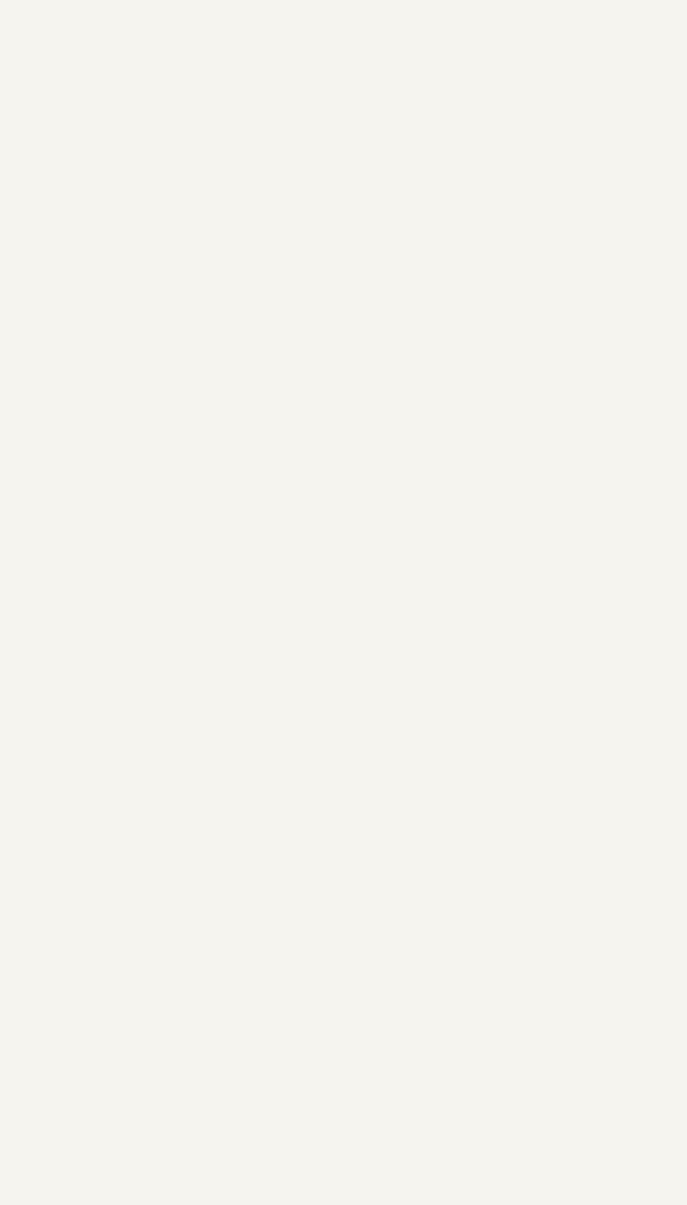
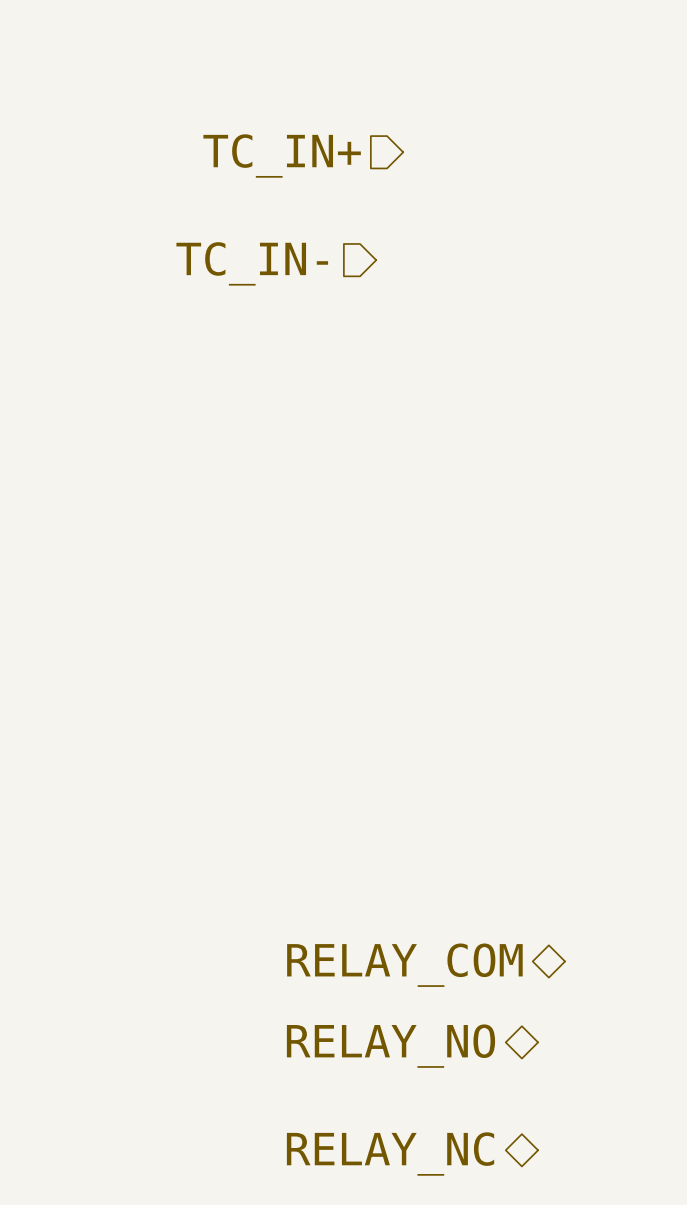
hierarchical label: none -> TC_IN+ (282, 156)
hierarchical label: none -> TC_IN- (252, 263)
hierarchical label: none -> RELAY_COM (404, 965)
hierarchical label: none -> RELAY_NO (391, 1046)
hierarchical label: none -> RELAY_NC (390, 1154)

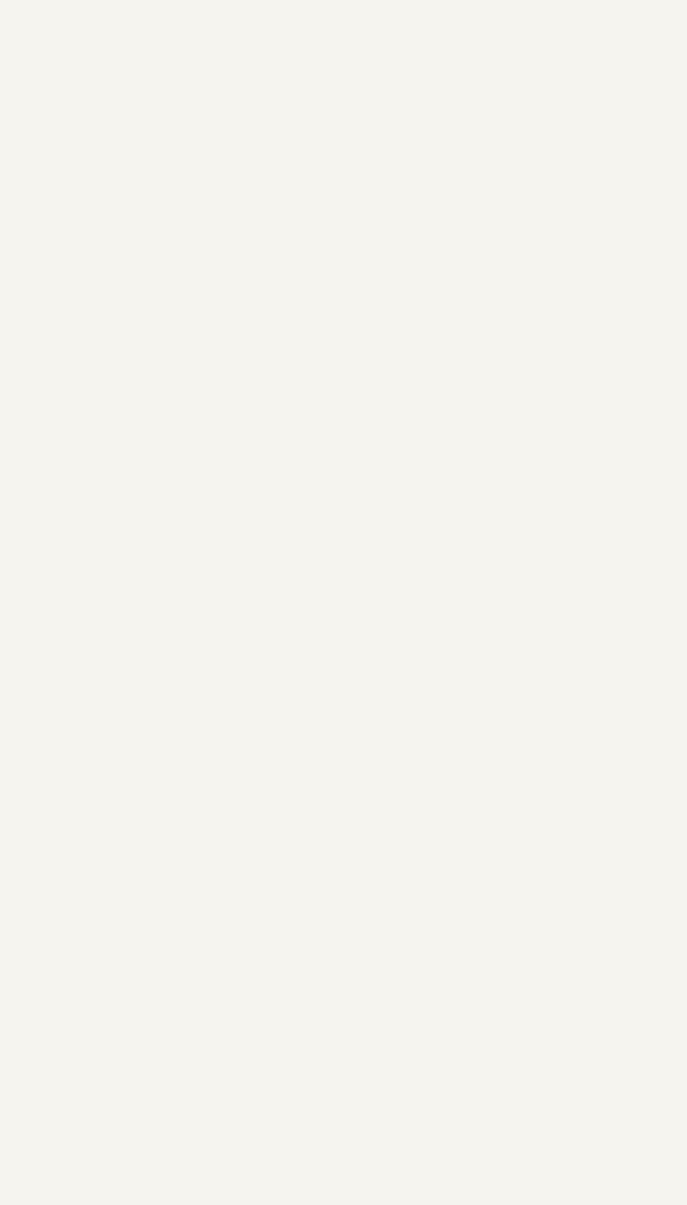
hierarchical label: TC_IN+ (282, 156) -> none
hierarchical label: TC_IN- (252, 263) -> none
hierarchical label: RELAY_COM (404, 965) -> none
hierarchical label: RELAY_NO (391, 1046) -> none
hierarchical label: RELAY_NC (390, 1154) -> none

